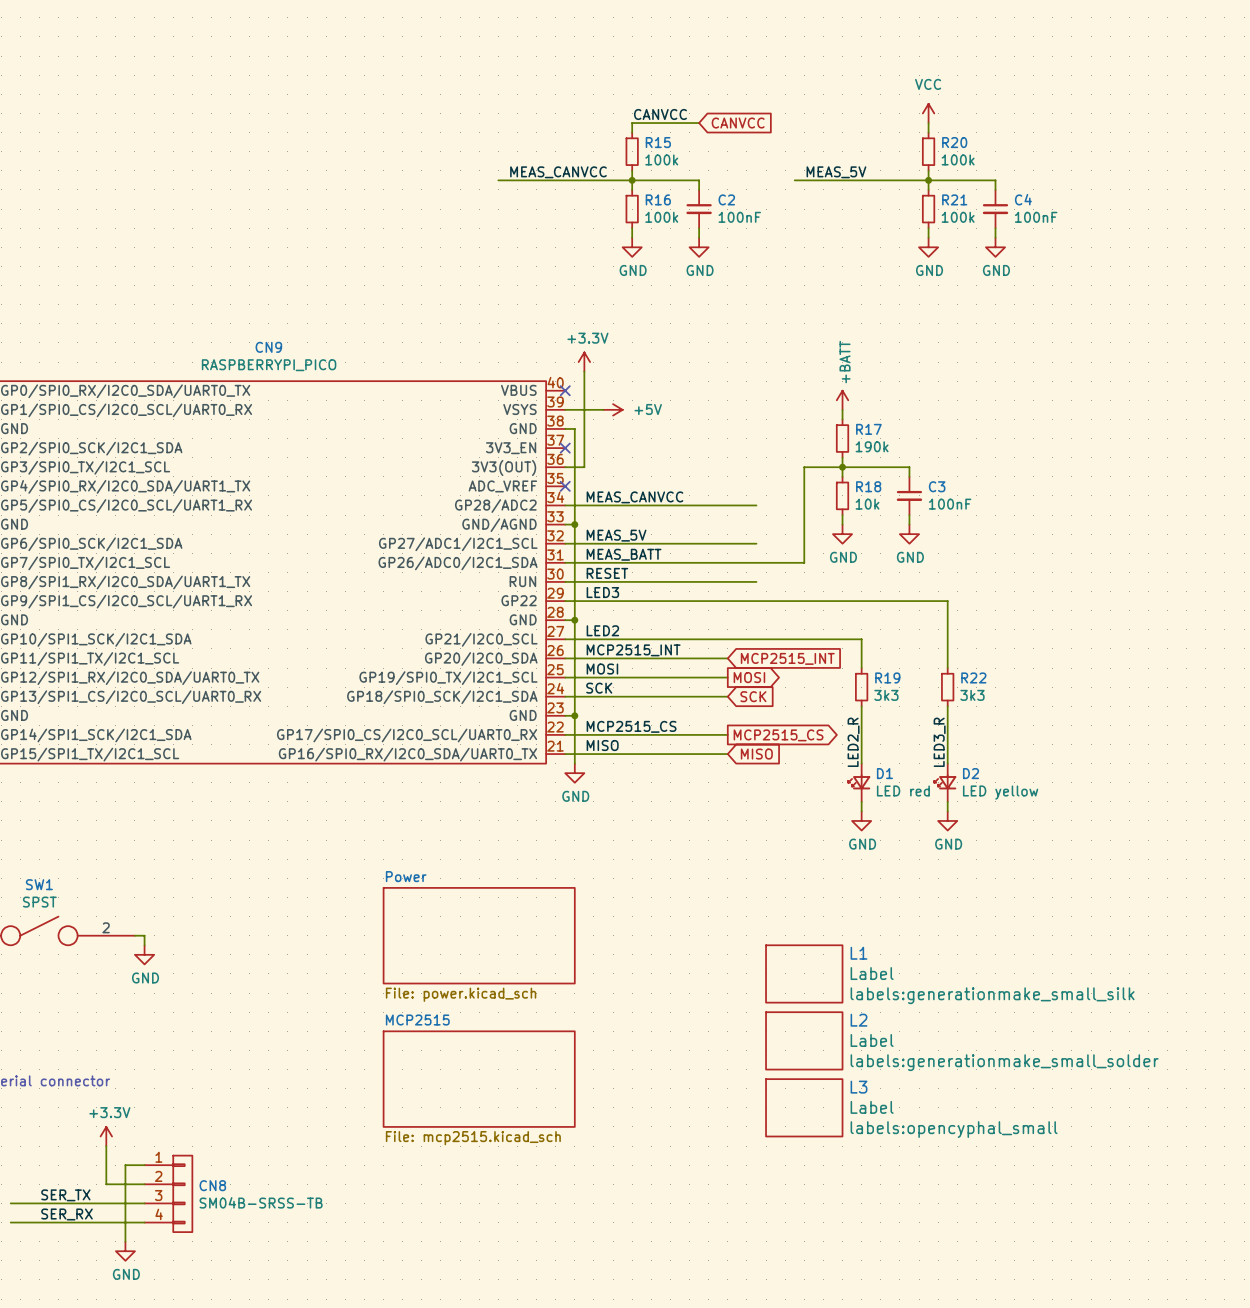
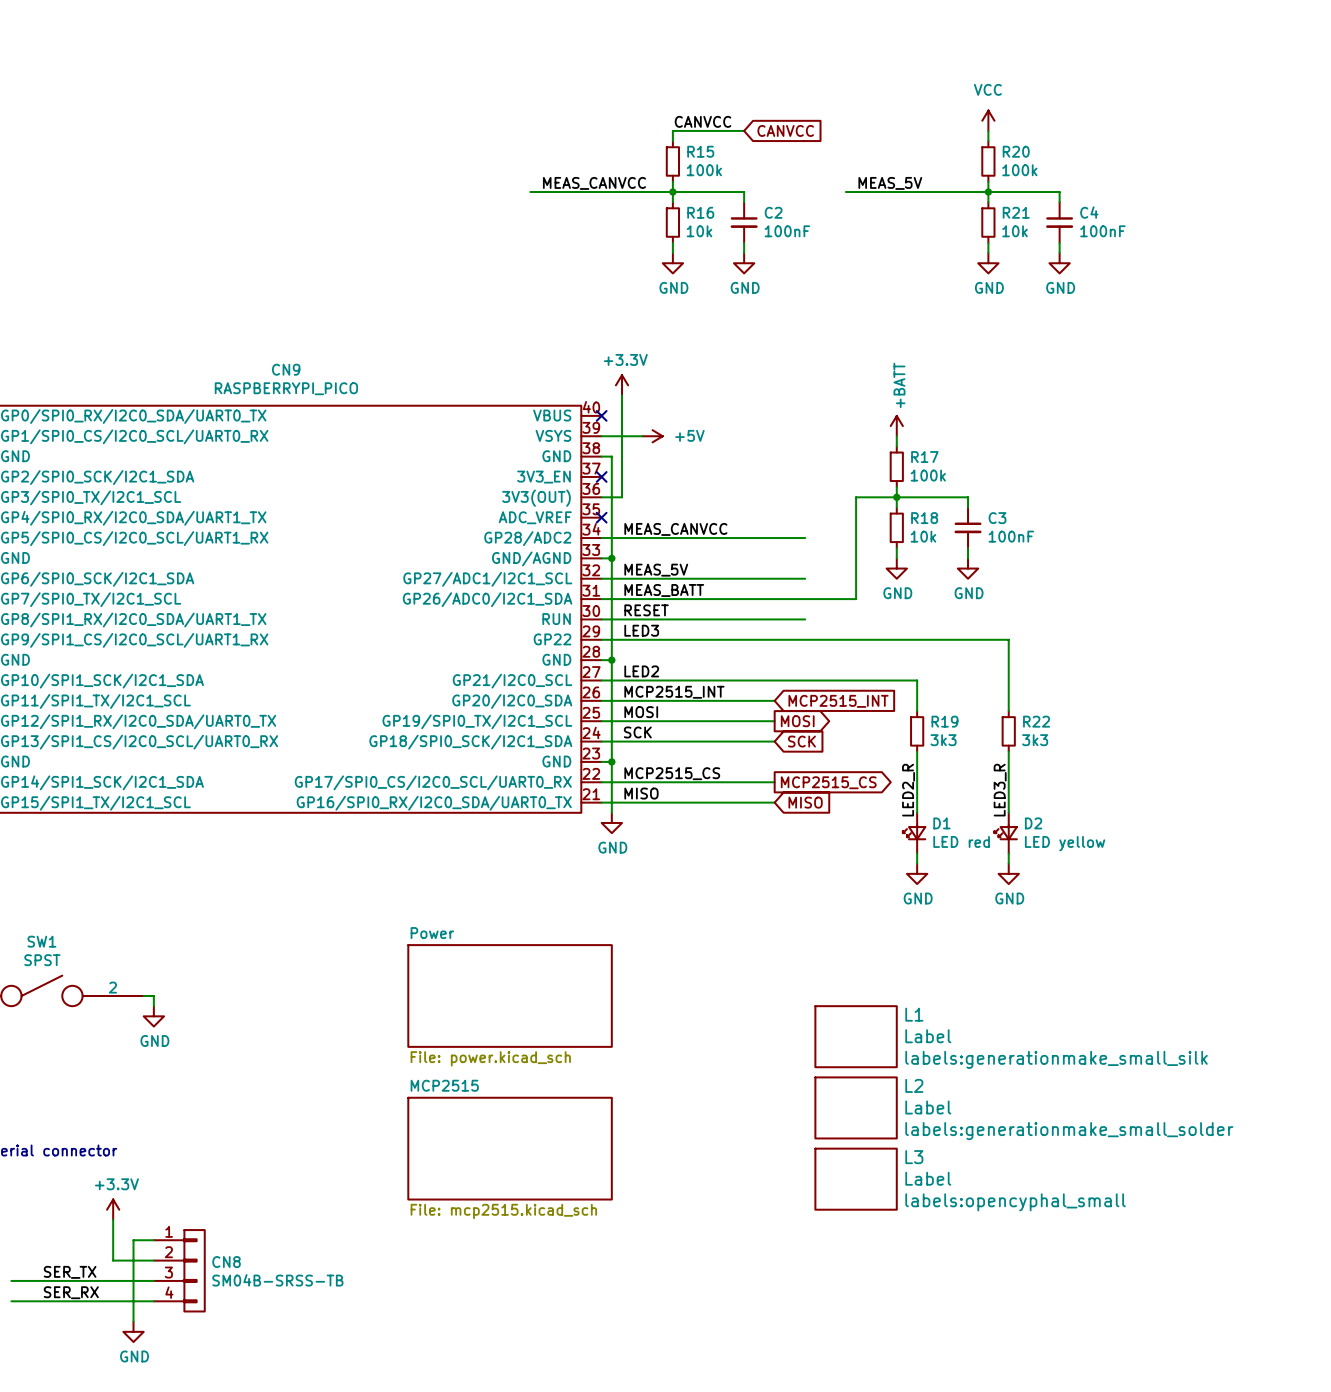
R16 value: 100k (661, 217) -> 10k (699, 231)
R21 value: 100k (958, 217) -> 10k (1015, 231)
R17 value: 190k (872, 446) -> 100k (928, 475)

